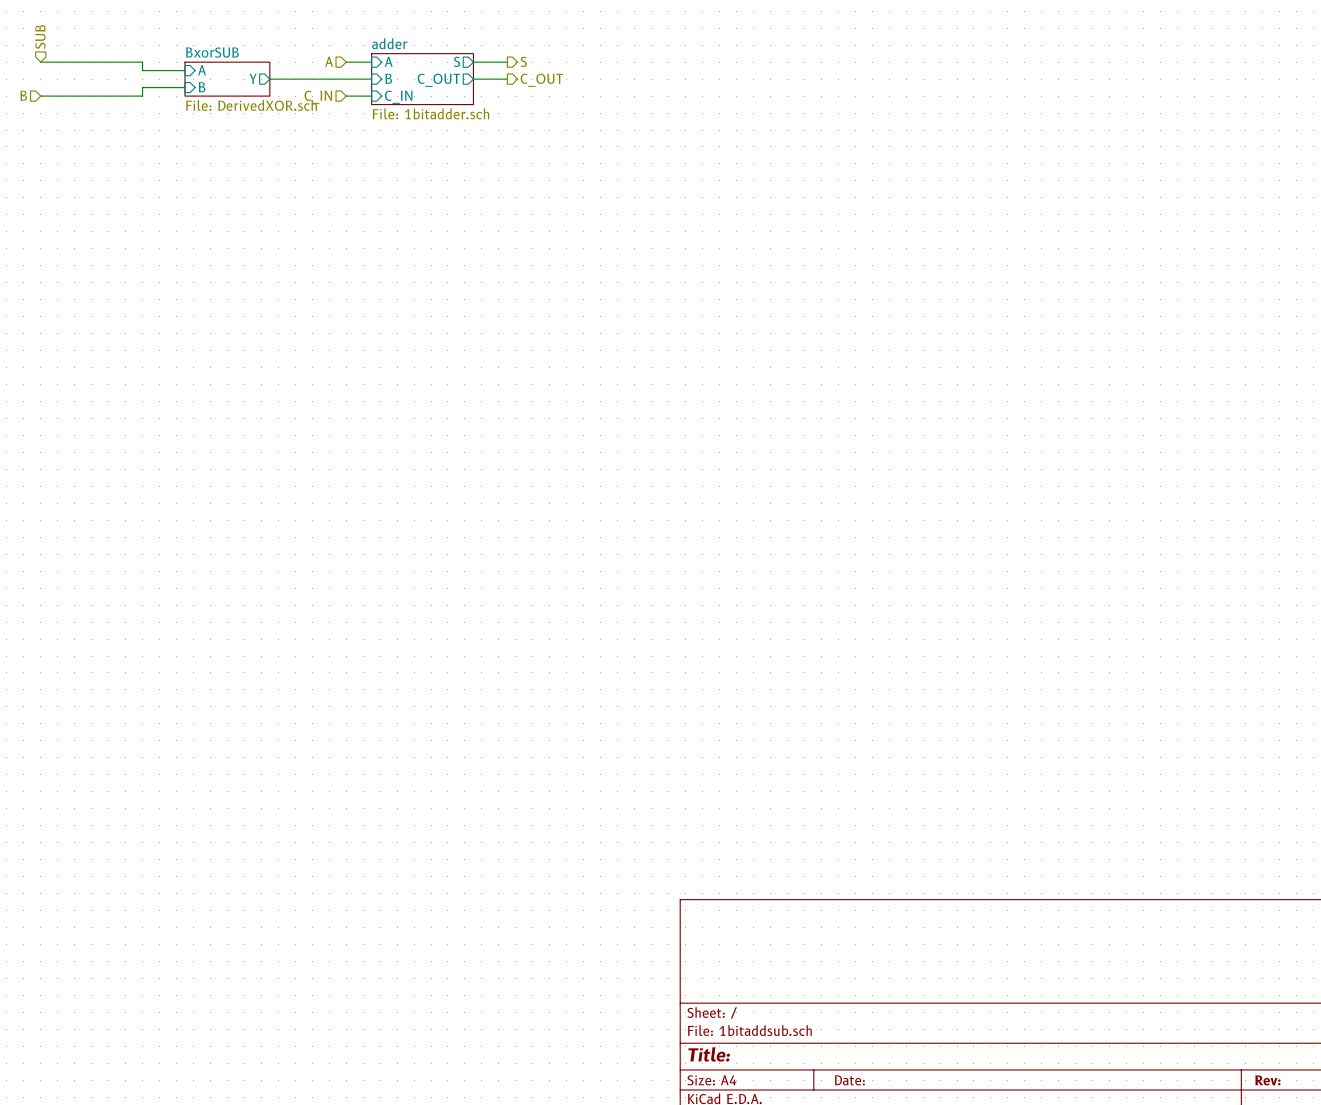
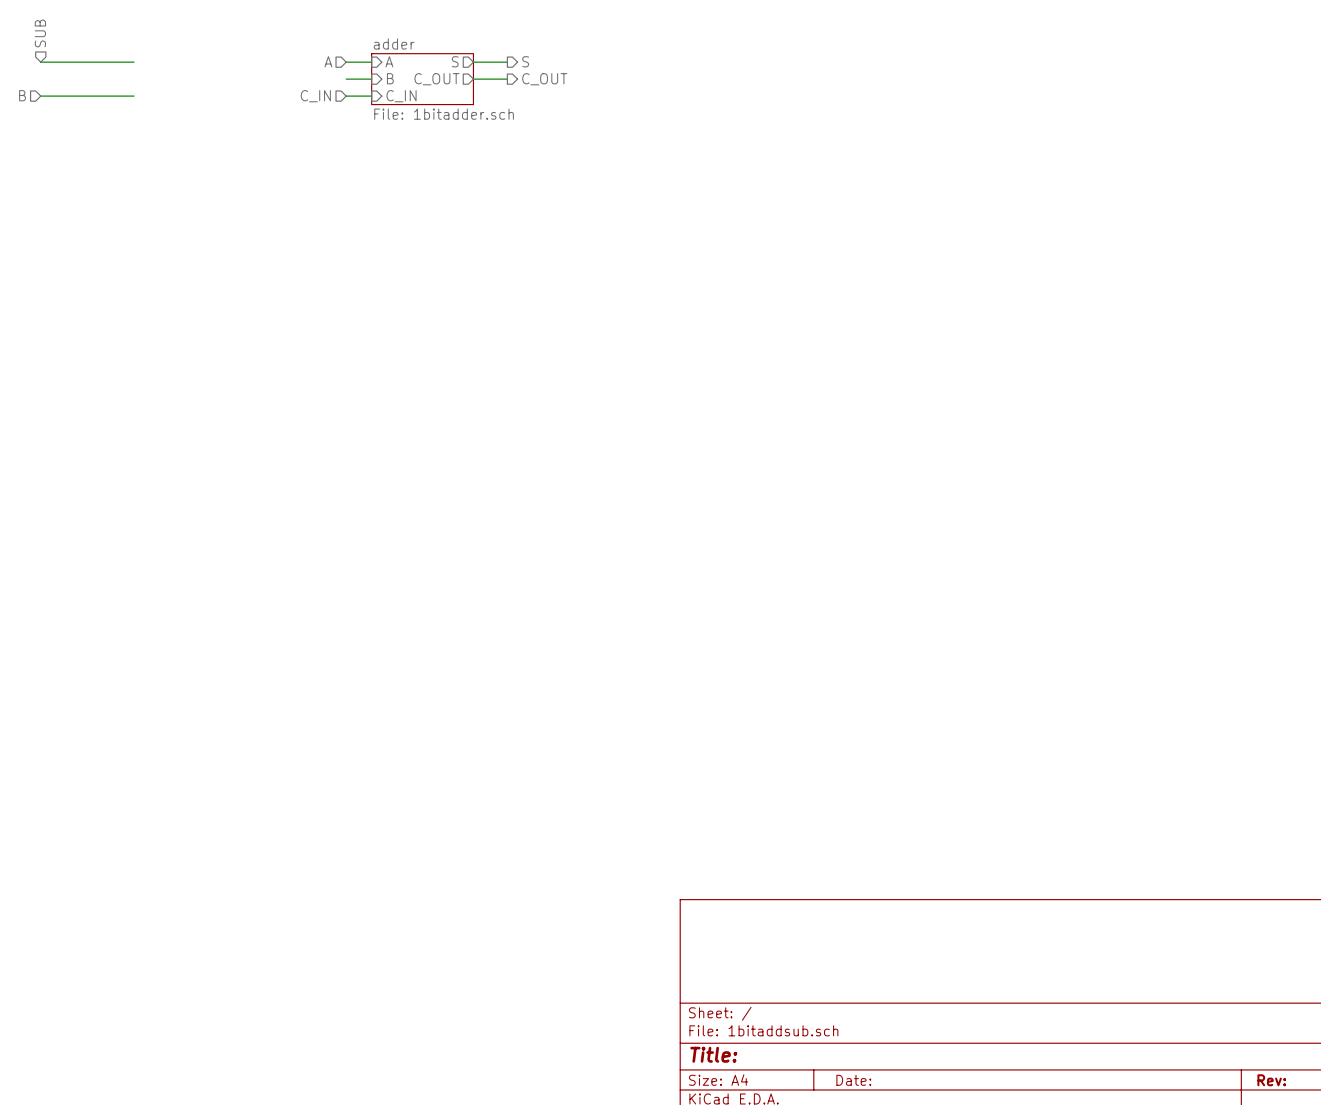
wire: (134, 62) (142, 62) (142, 70) (185, 70) -> none
sheet pin: A (202, 70) -> none
sheet pin: Y (253, 78) -> none
sheet BxorSUB: File: DerivedXOR.sch (227, 79) -> none
wire: (269, 79) (346, 79) -> none
wire: (185, 87) (142, 87) (142, 96) (134, 96) -> none
sheet pin: B (202, 87) -> none

